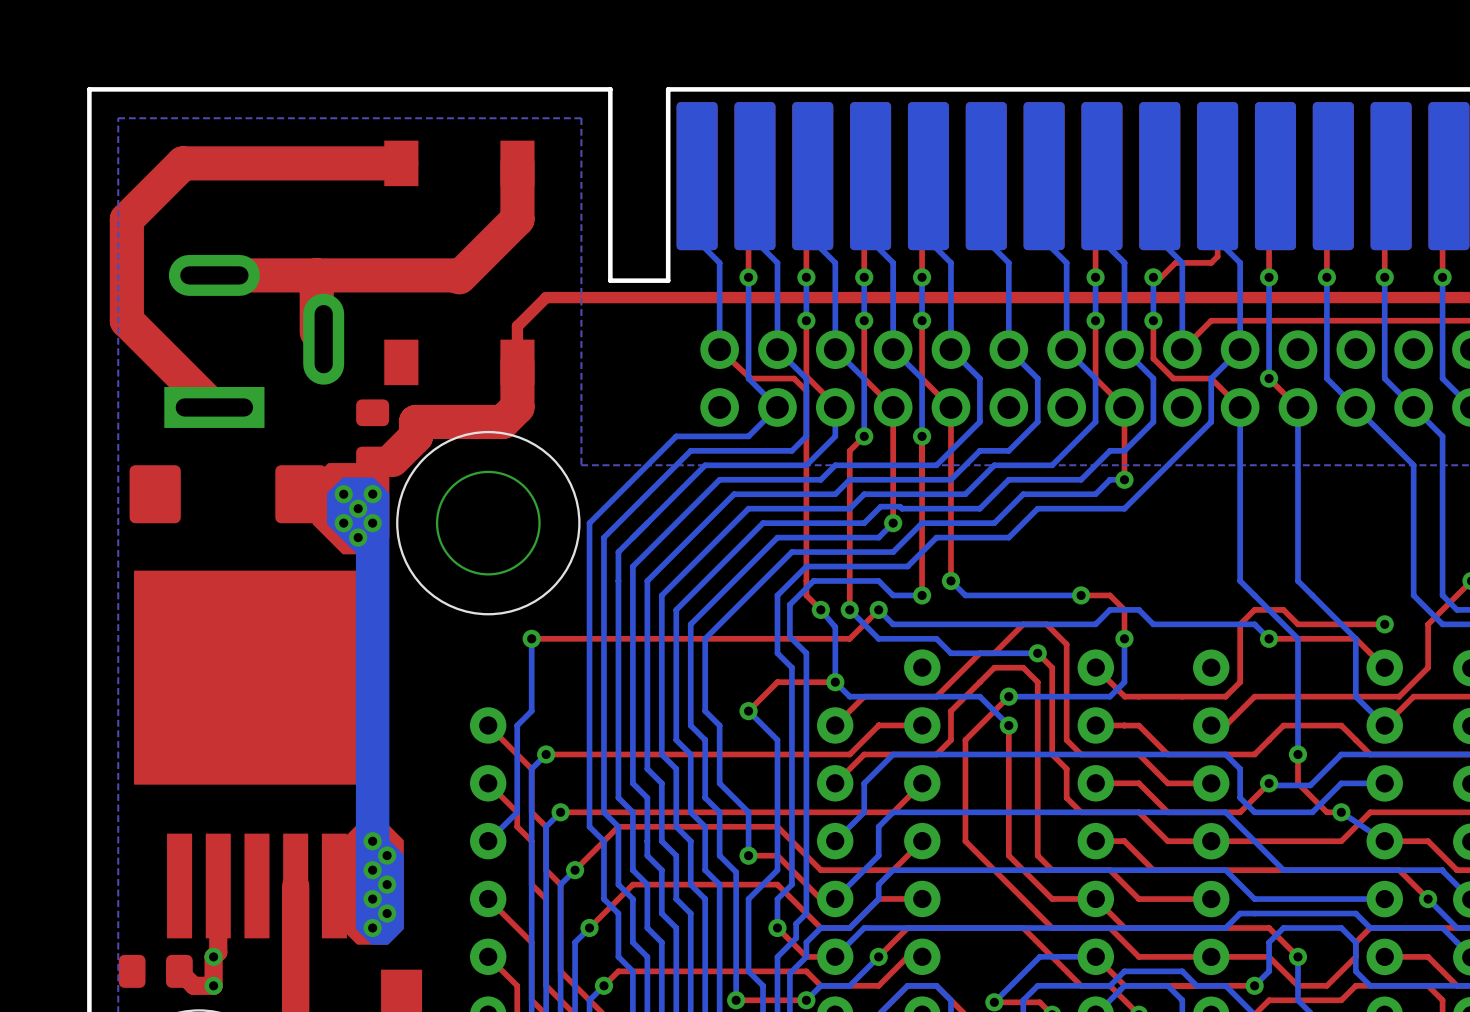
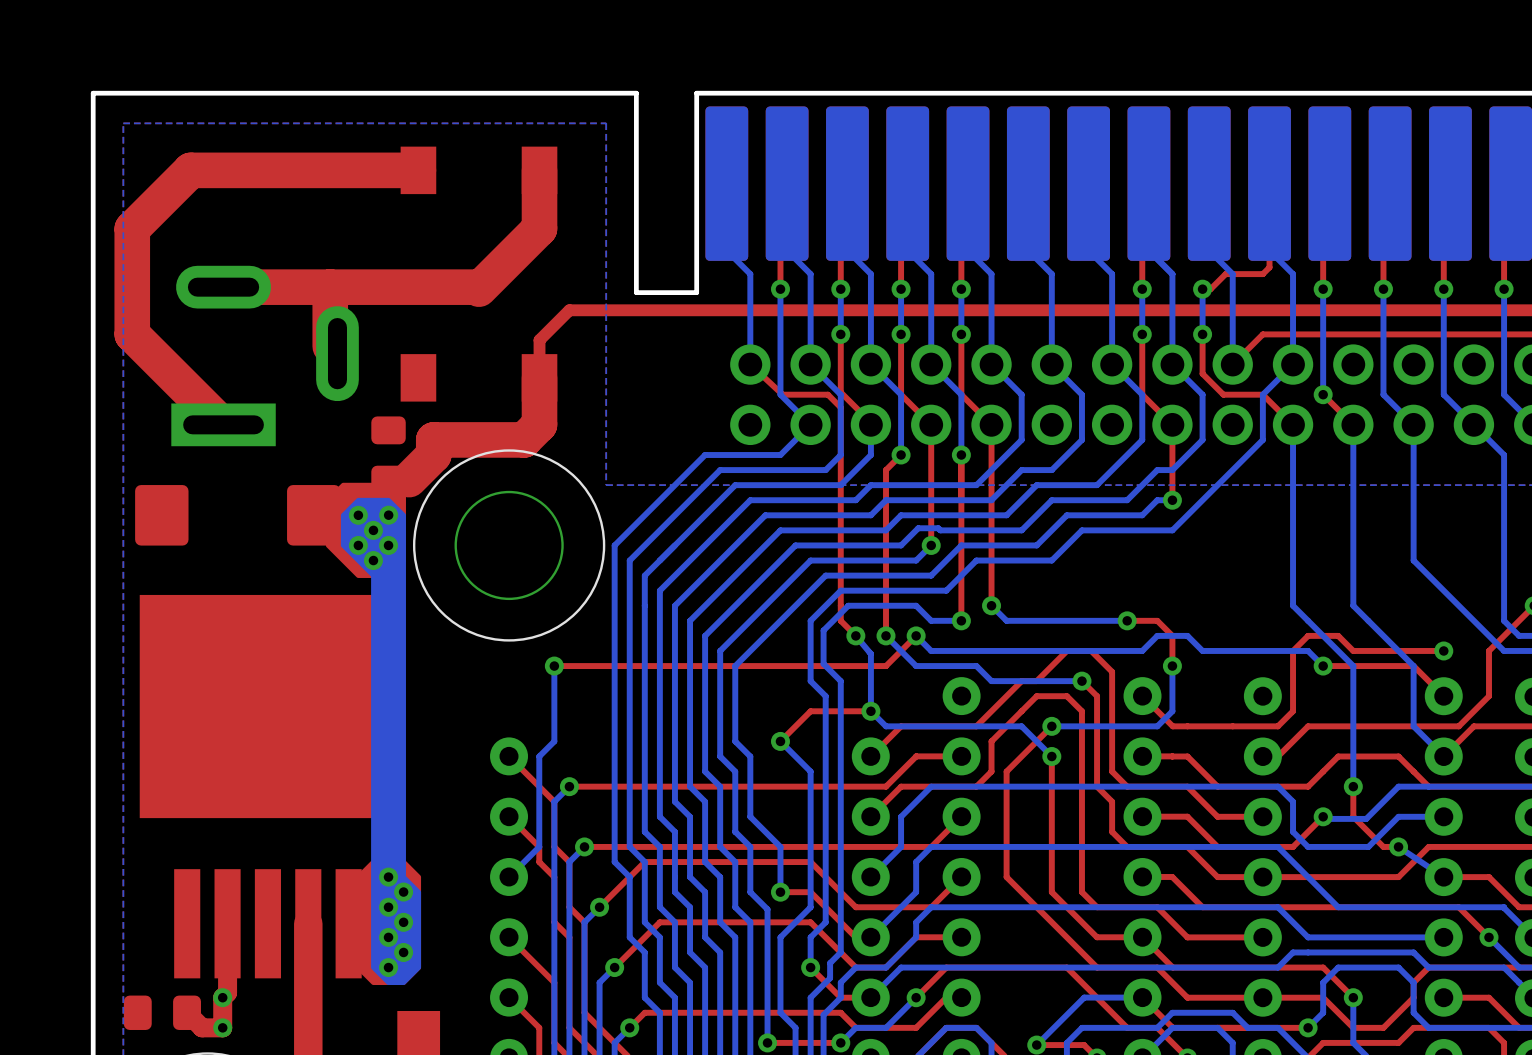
bottom track: (1355, 407) (1413, 465) (1413, 595) -> (1413, 424) (1413, 560) (1473, 620)

